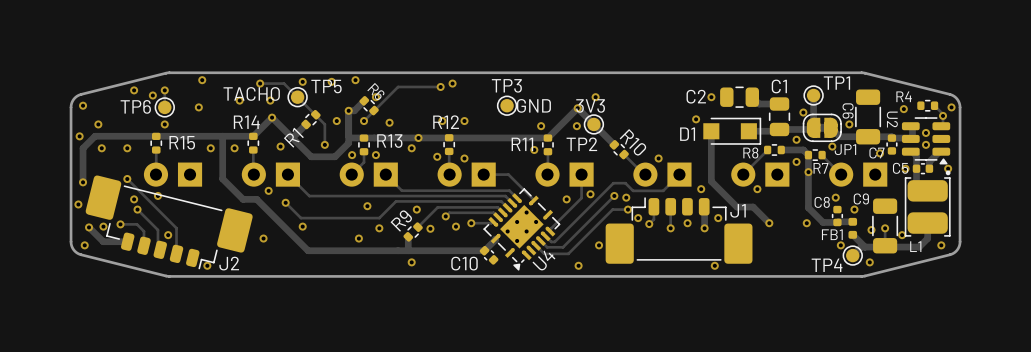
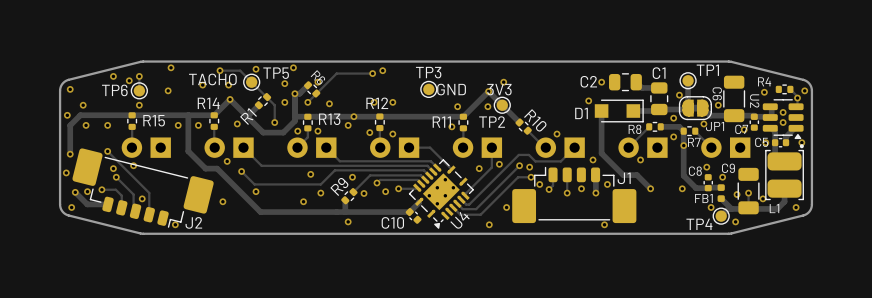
via: none -> (293, 67)
via: (355, 80) -> none
via: (331, 81) -> none
via: none -> (284, 83)

